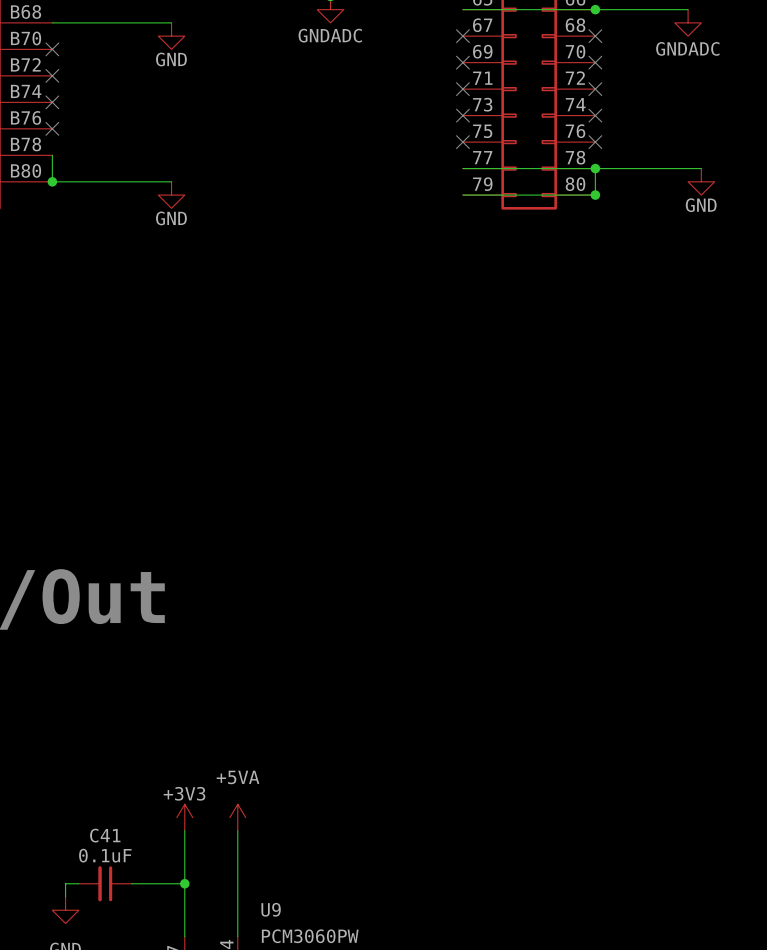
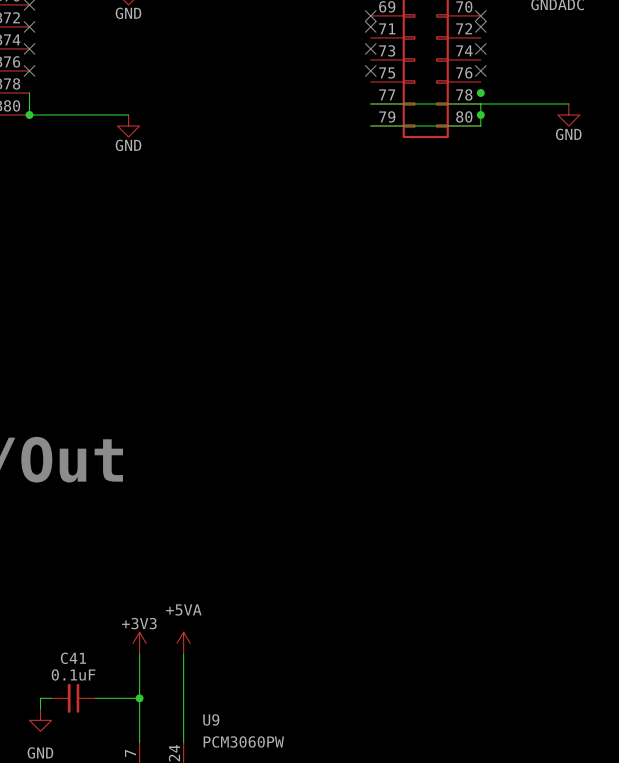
no-connect mark: none -> (370, 26)
no-connect mark: none -> (480, 26)
no-connect mark: (462, 89) -> none
no-connect mark: (595, 89) -> none
no-connect mark: none -> (370, 48)
no-connect mark: none -> (480, 48)
no-connect mark: (462, 115) -> none
no-connect mark: (595, 115) -> none
no-connect mark: none -> (370, 70)
no-connect mark: none -> (480, 70)
no-connect mark: (462, 142) -> none
no-connect mark: (595, 142) -> none
junction: none -> (480, 92)
junction: (595, 168) -> none
junction: none -> (480, 115)
junction: (595, 195) -> none

